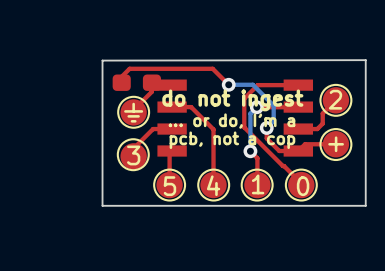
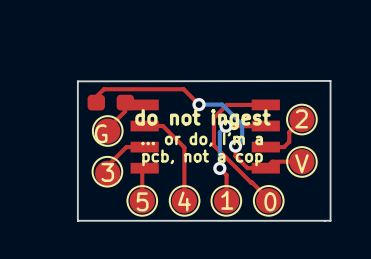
text: ⏚ (133, 112) -> G (101, 133)
text: + (336, 144) -> V (301, 163)

